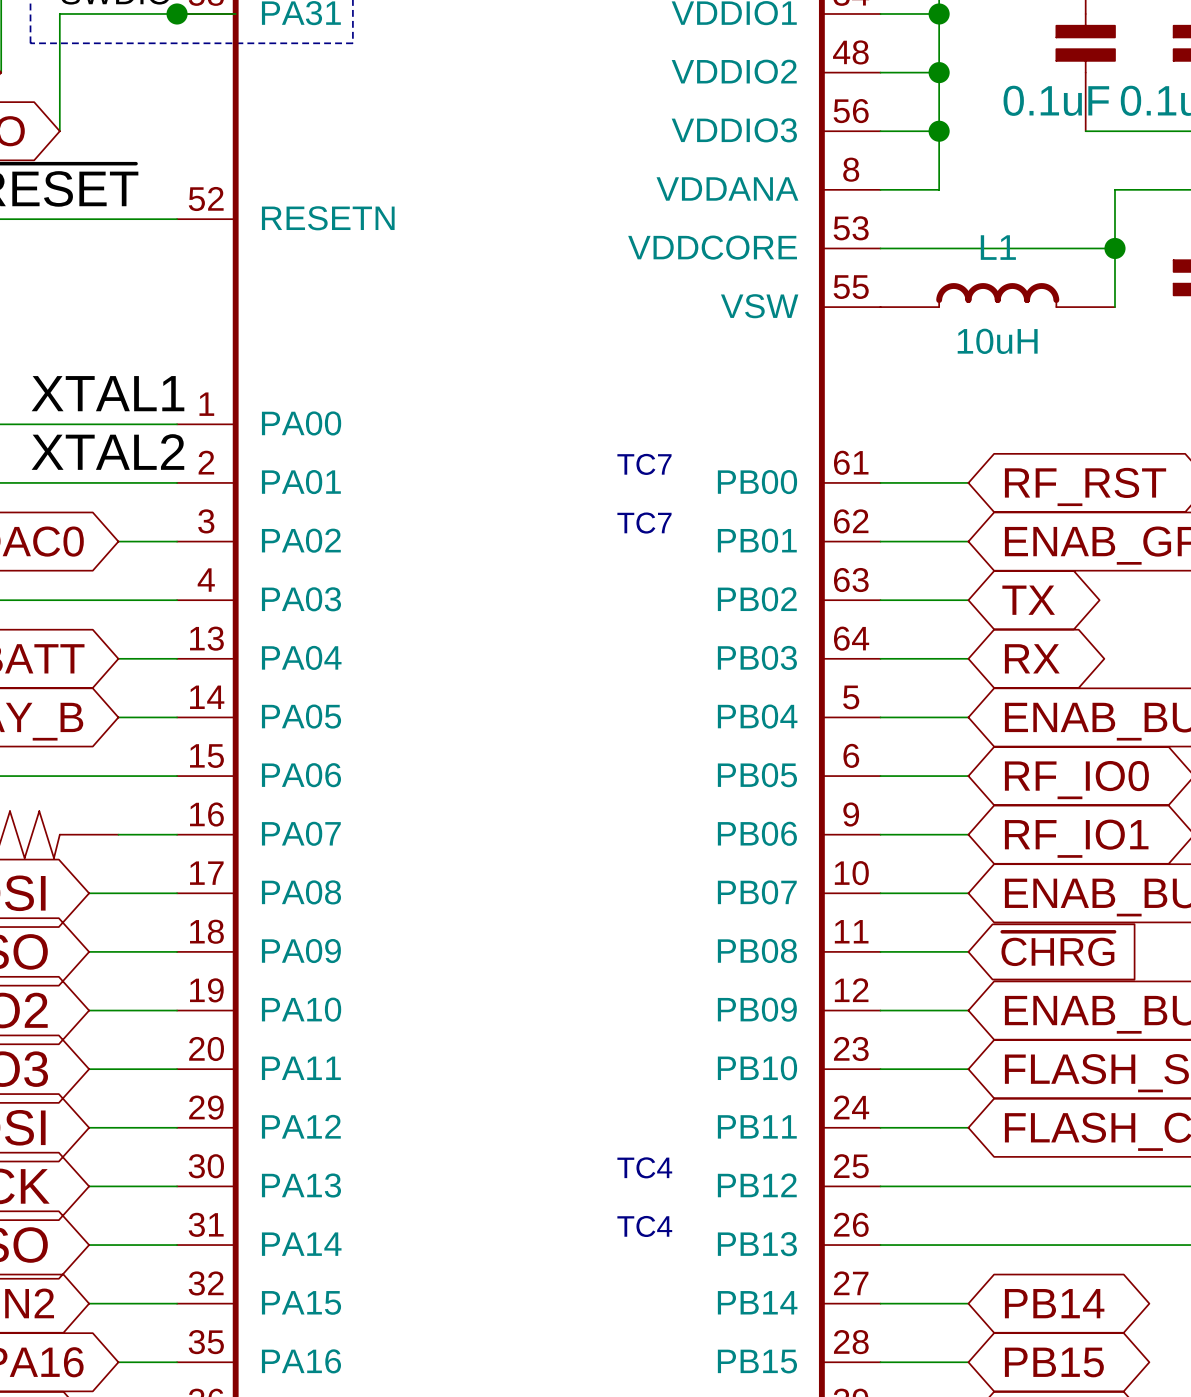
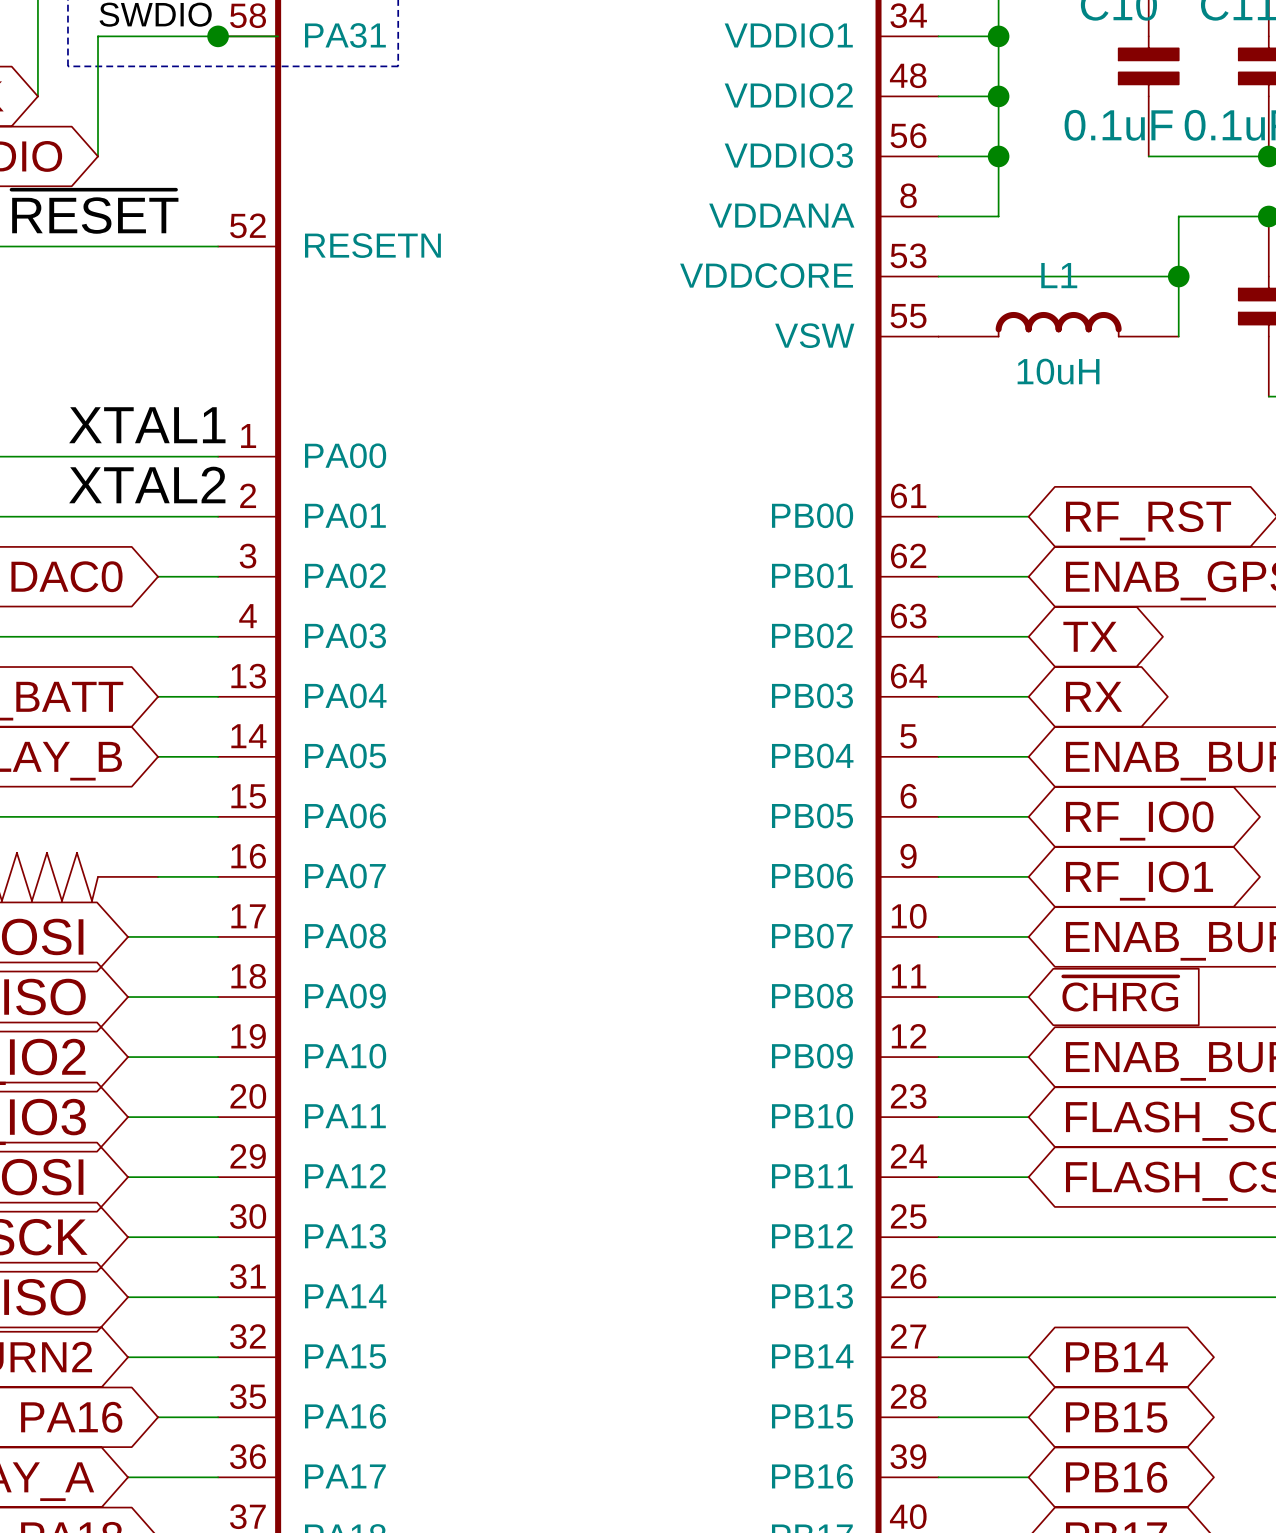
text: TC7 (644, 464) -> none
text: TC7 (644, 523) -> none
text: TC4 (644, 1167) -> none
text: TC4 (644, 1226) -> none

